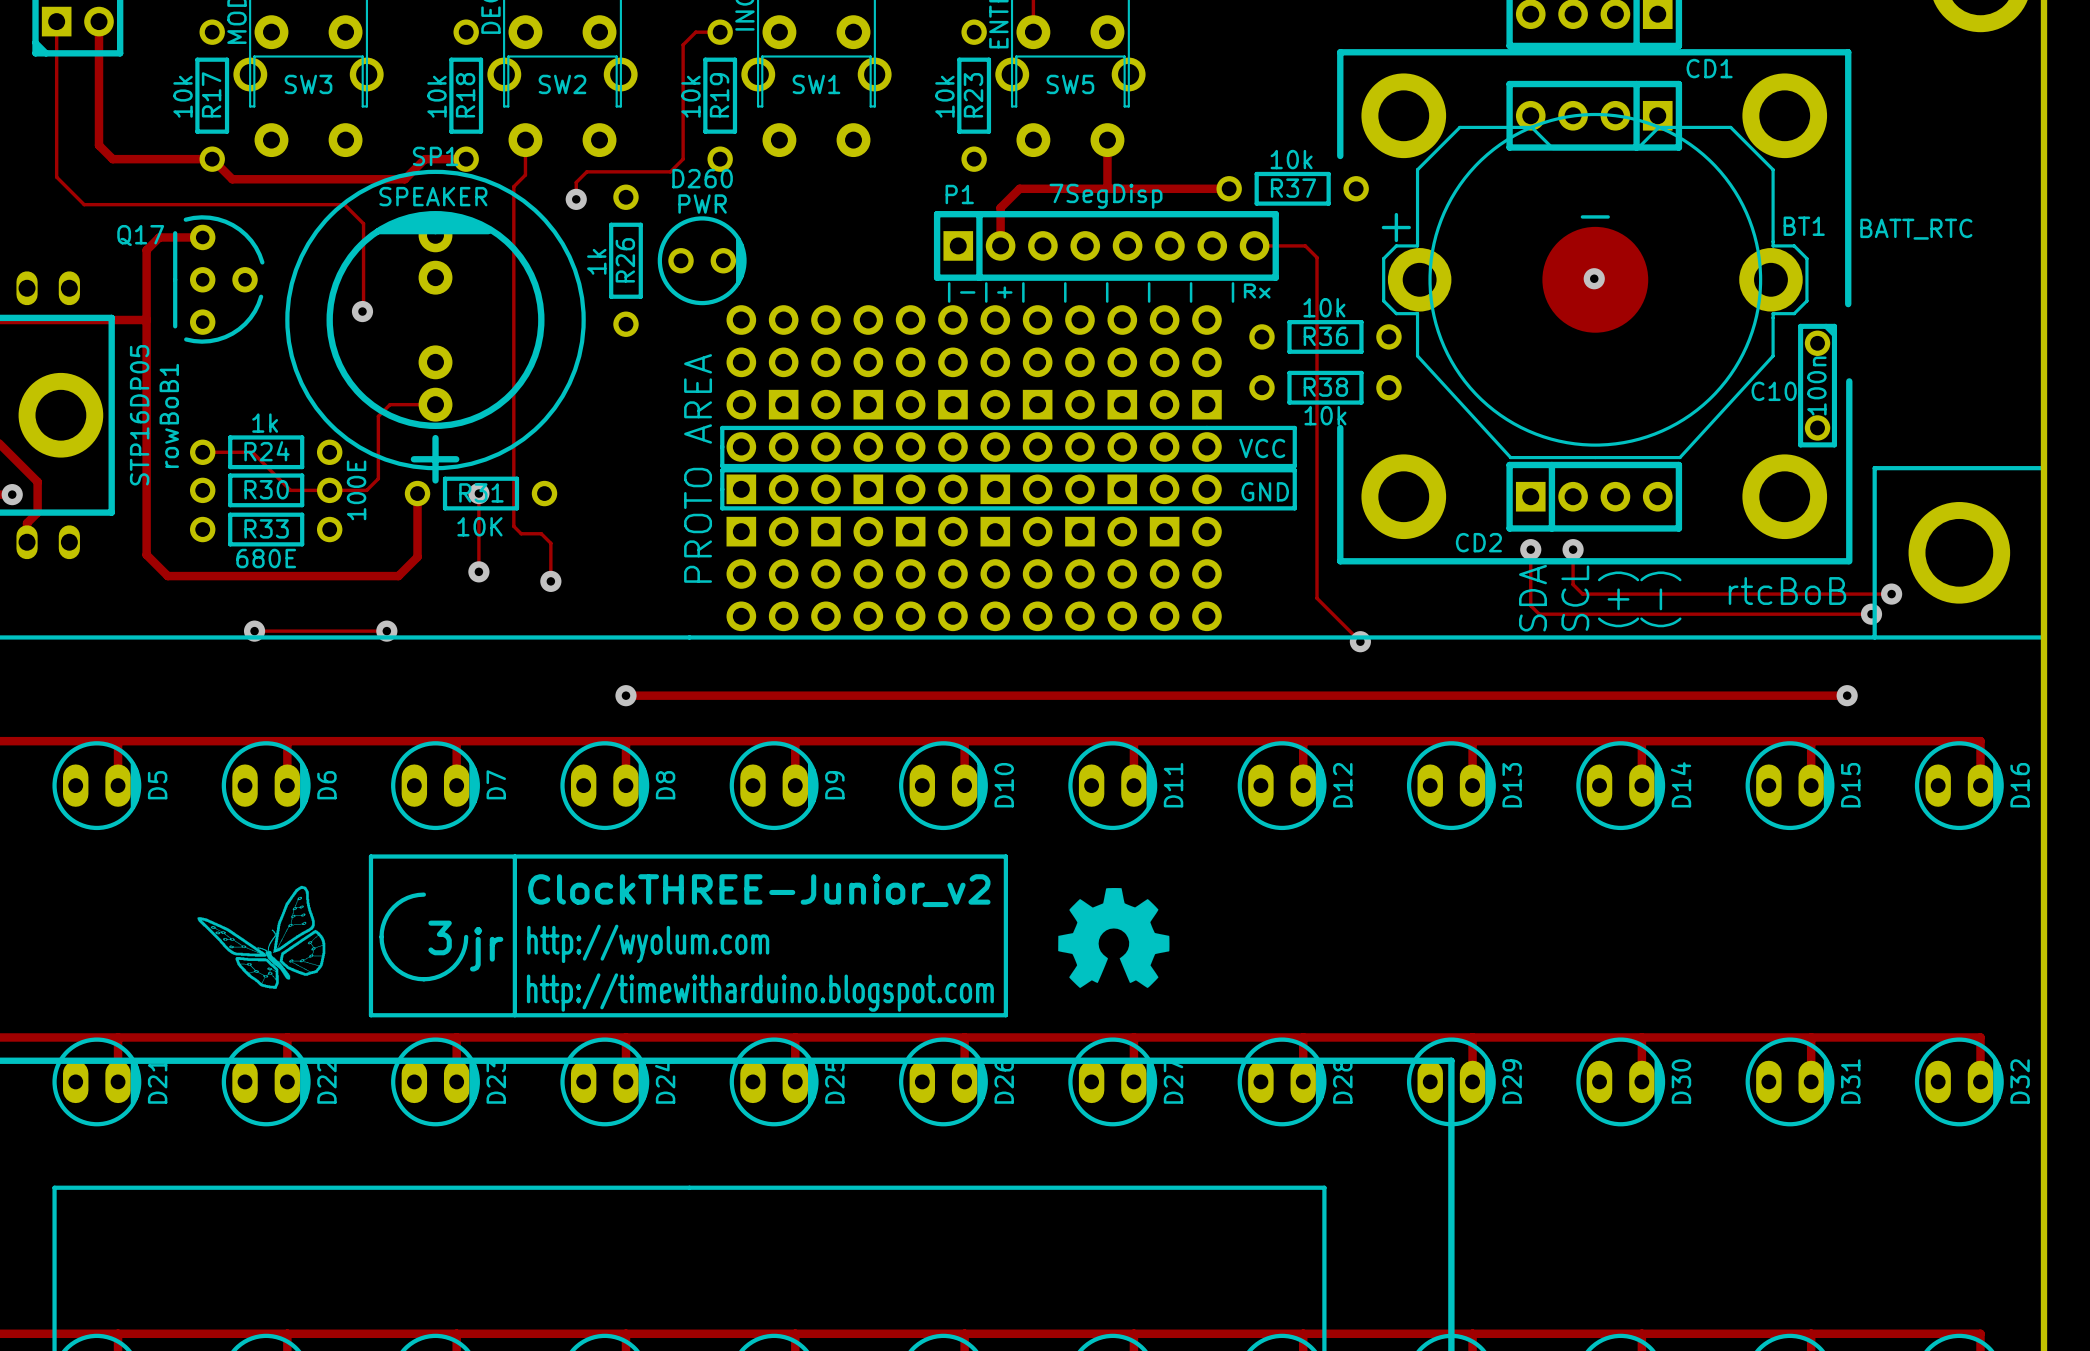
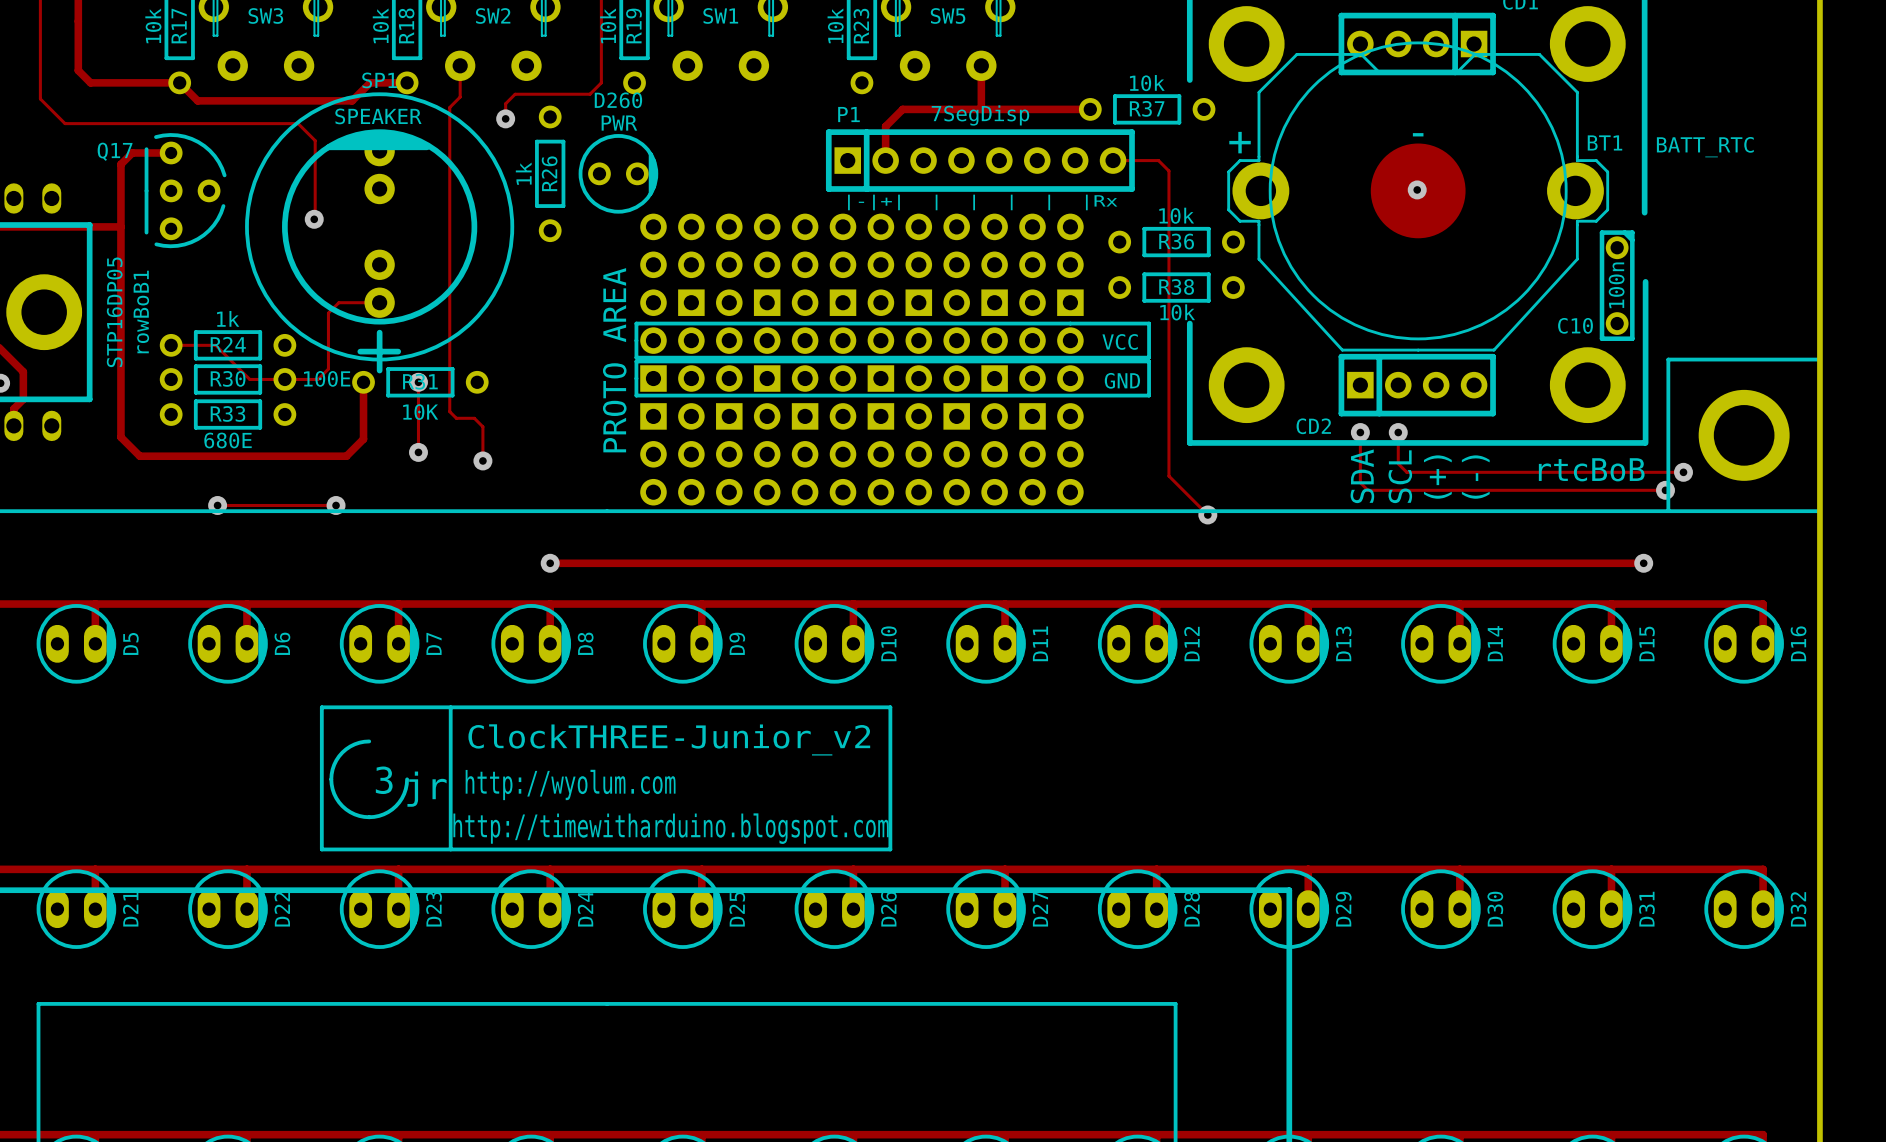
C10 name position: C10 (1774, 391) -> C10 (1575, 325)
R30 value rotation: 0° (356, 490) -> 90° clockwise (327, 378)
drawing: [197, 885, 326, 989] -> none
drawing: [1058, 887, 1170, 989] -> none

